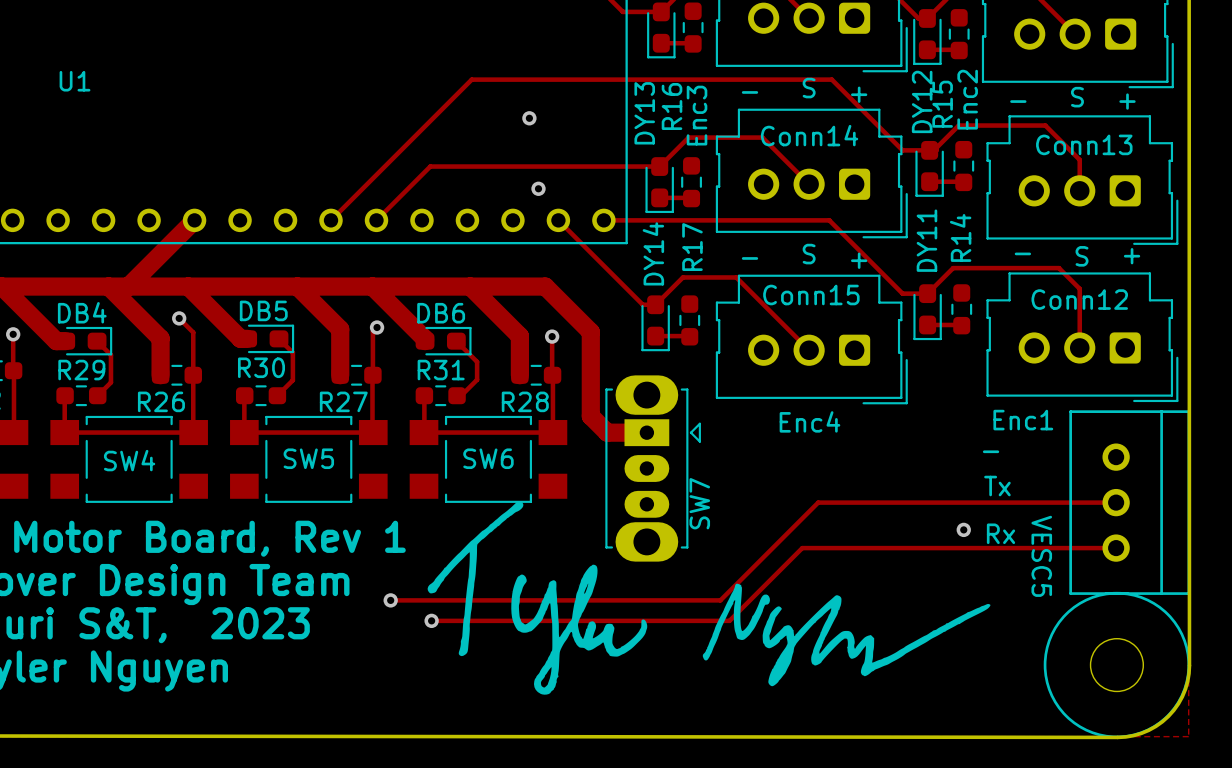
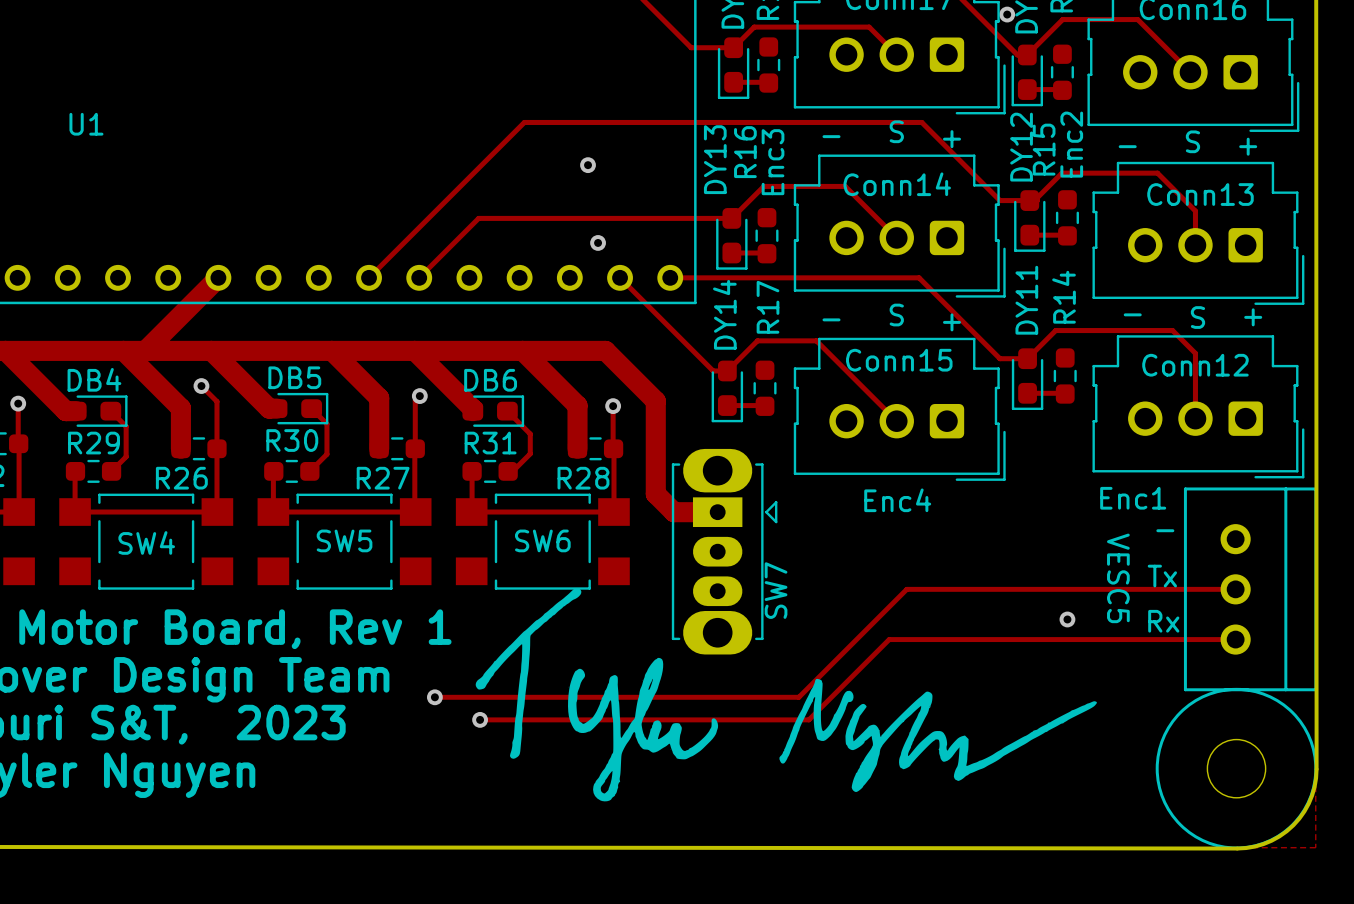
text position: - (991, 451) -> - (1165, 530)
text: Tx (997, 486) -> VESC5 (1118, 578)
text: none -> Tx (1162, 576)
text position: Rx (1001, 533) -> Rx (1163, 621)
text: VESC5 (1041, 556) -> none

